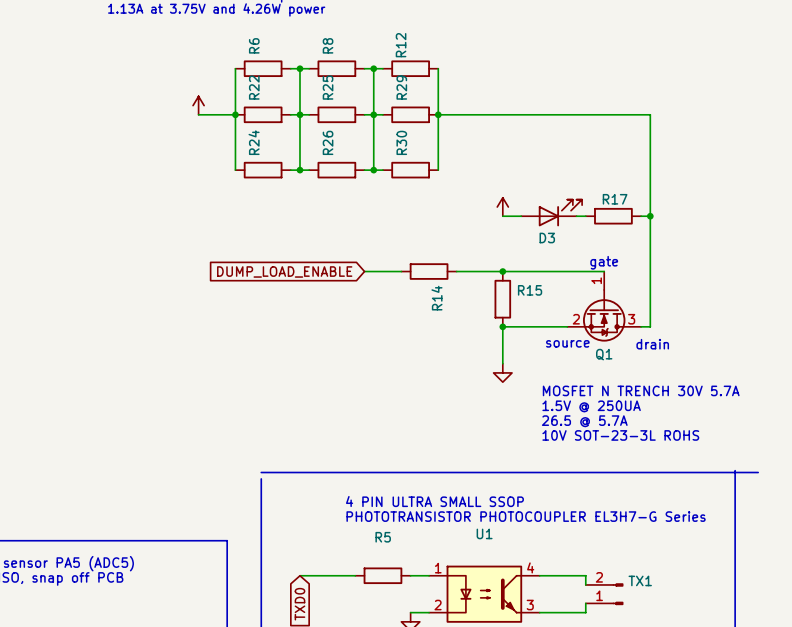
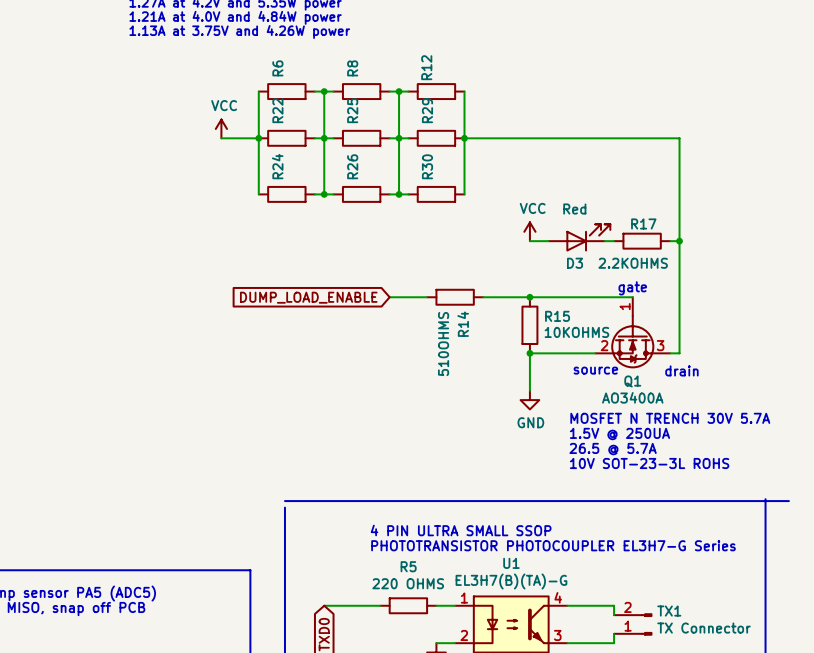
power symbol text: none -> VCC (224, 105)
power symbol text: none -> VCC (532, 208)
D3 value: none -> Red (574, 209)
R17 value: none -> 2.2KOHMS (633, 263)
R15 value: none -> 10KOHMS (576, 332)
R14 value: none -> 510OHMS (443, 344)
Q1 value: none -> AO3400A (632, 397)
power symbol text: none -> GND (530, 422)
U1 value: none -> EL3H7(B)(TA)-G (511, 581)
R5 value: none -> 220 OHMS (408, 583)
TX1 value: none -> TX Connector (704, 628)

